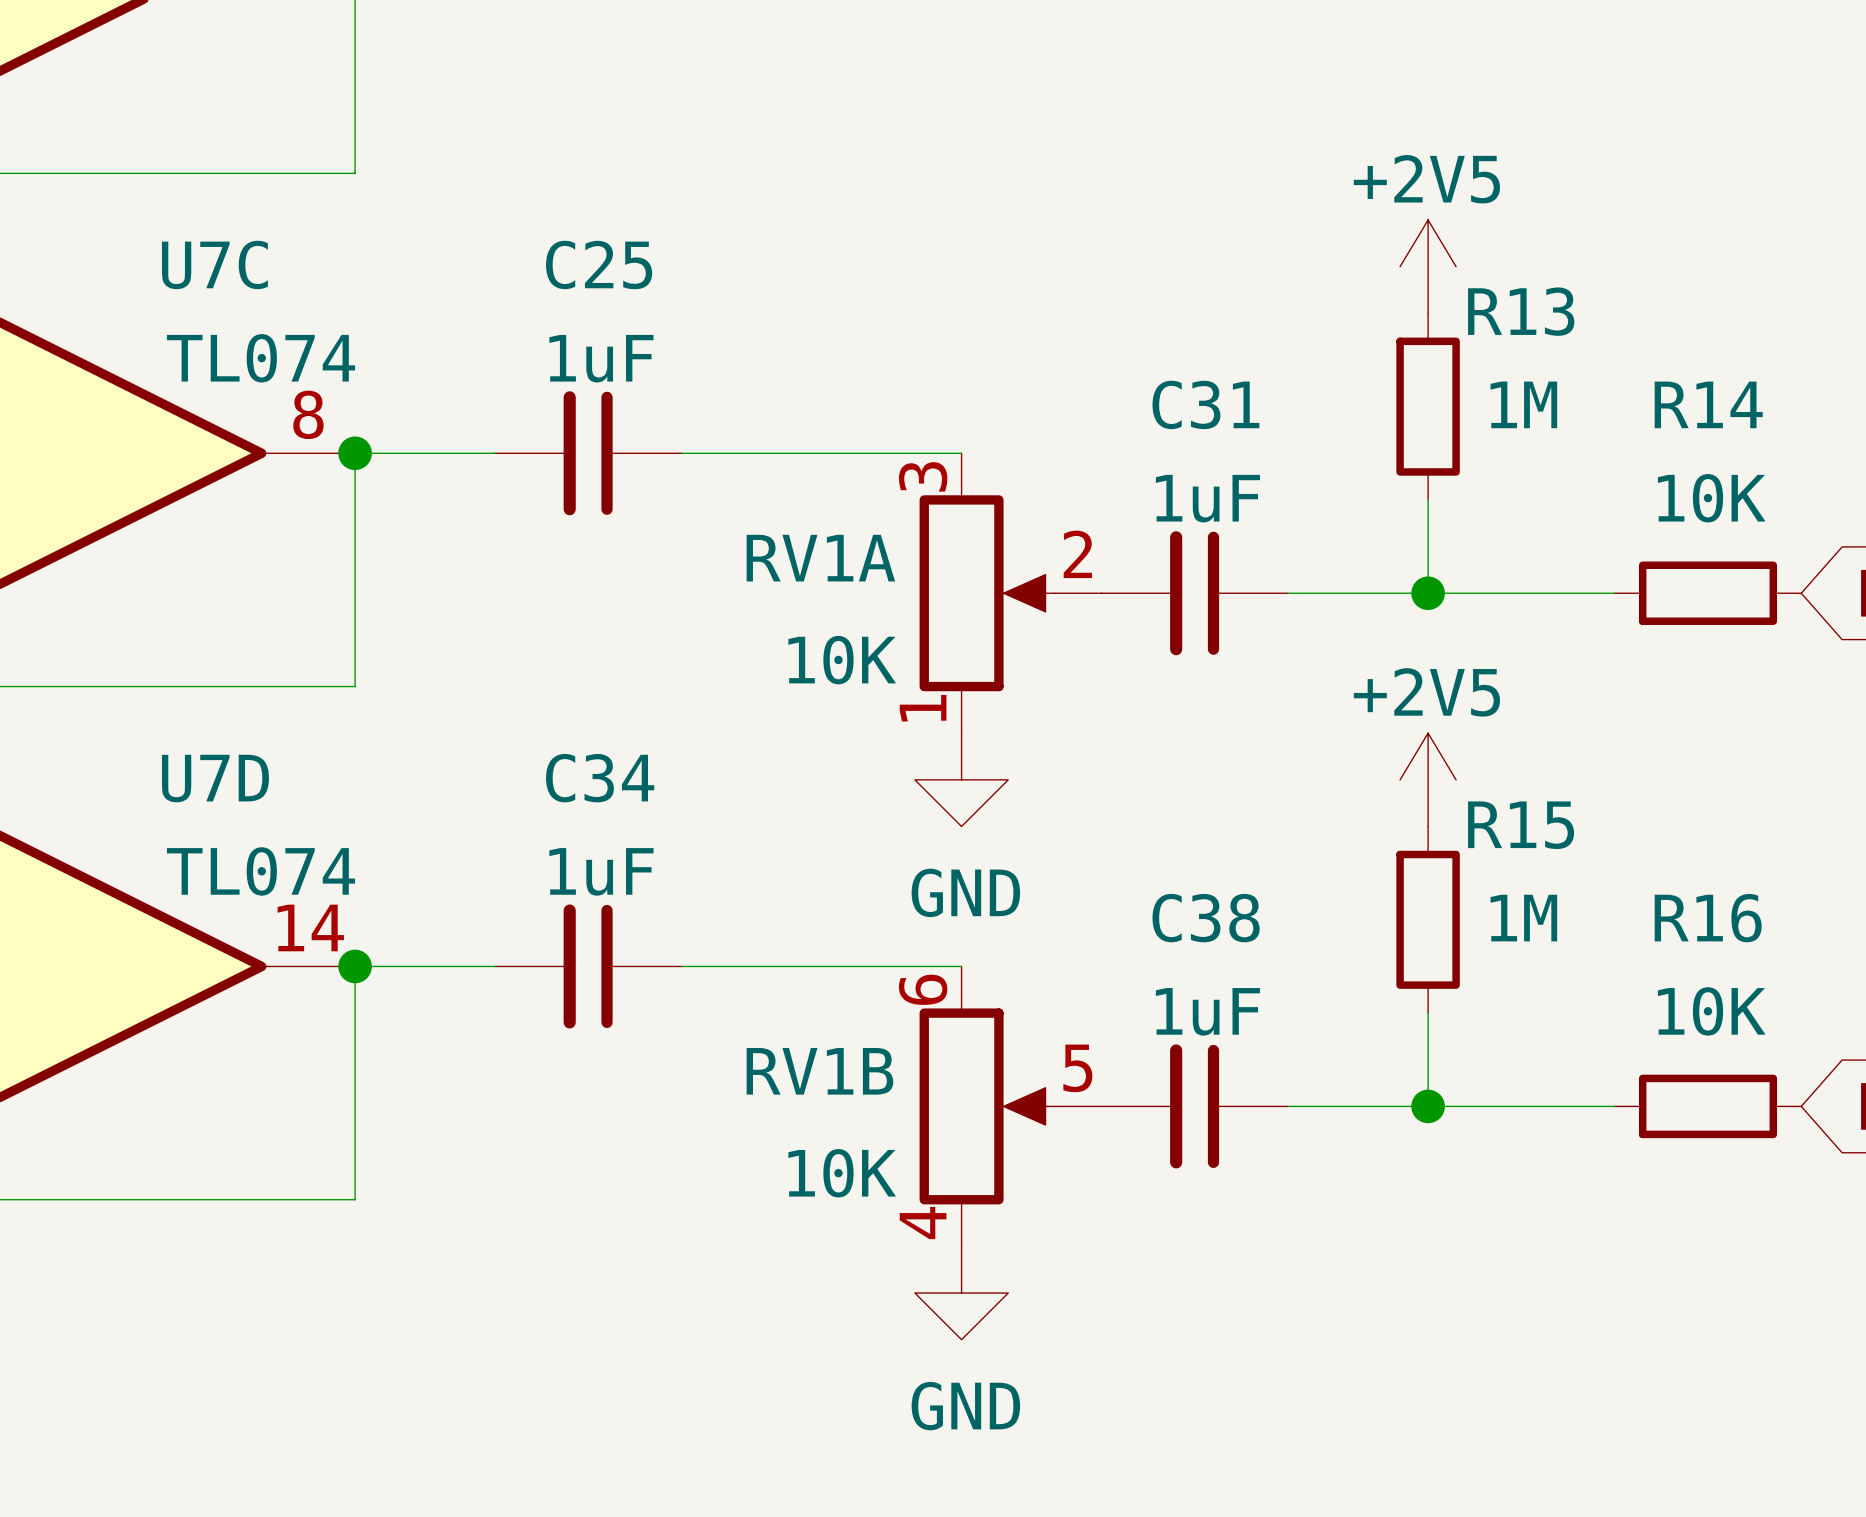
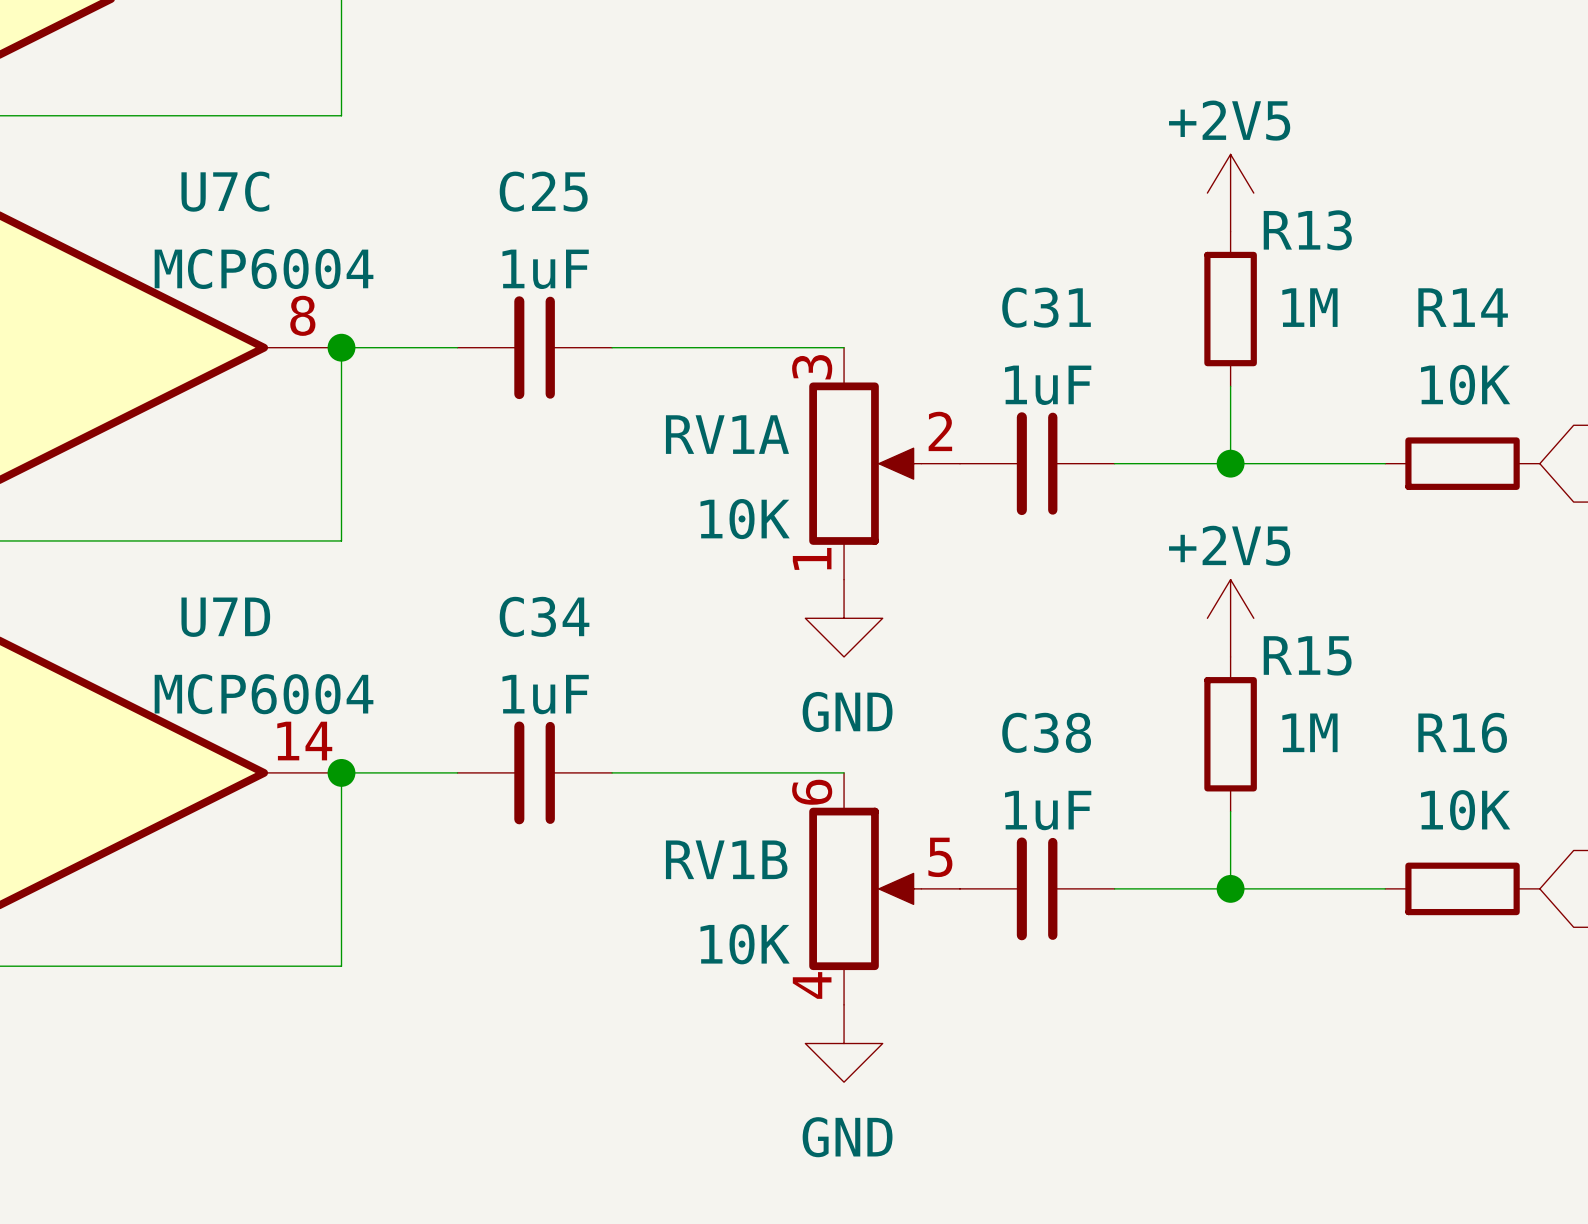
U7C value: TL074 (260, 358) -> MCP6004 (264, 268)
U7D value: TL074 (260, 871) -> MCP6004 (264, 694)

